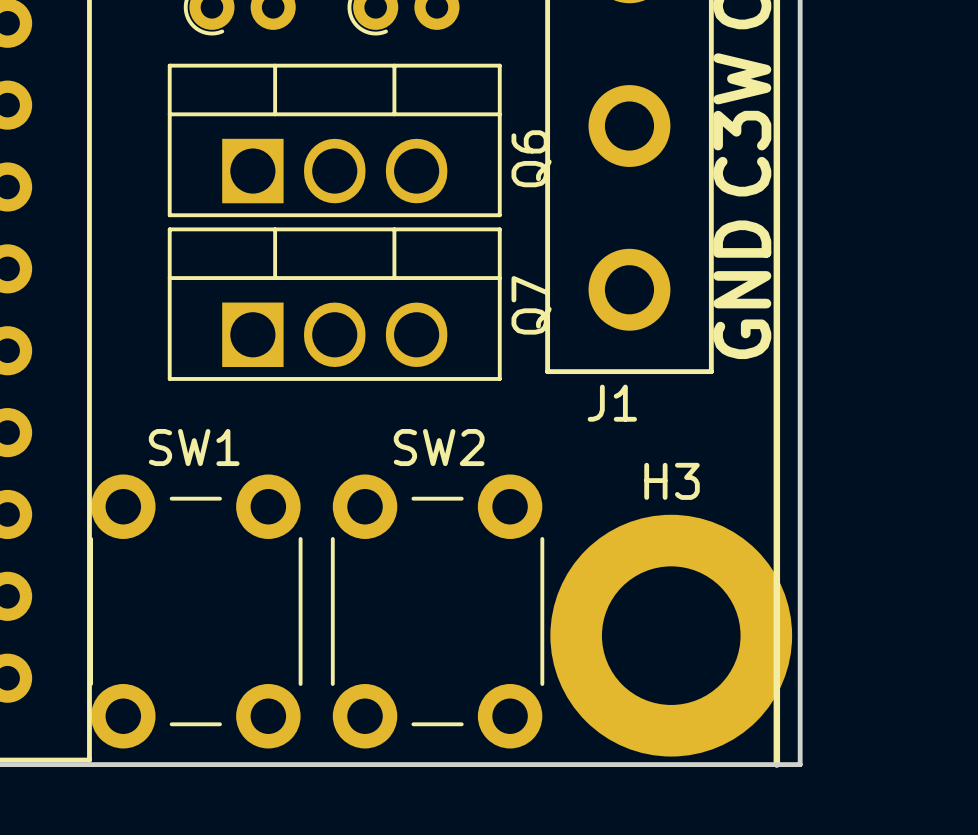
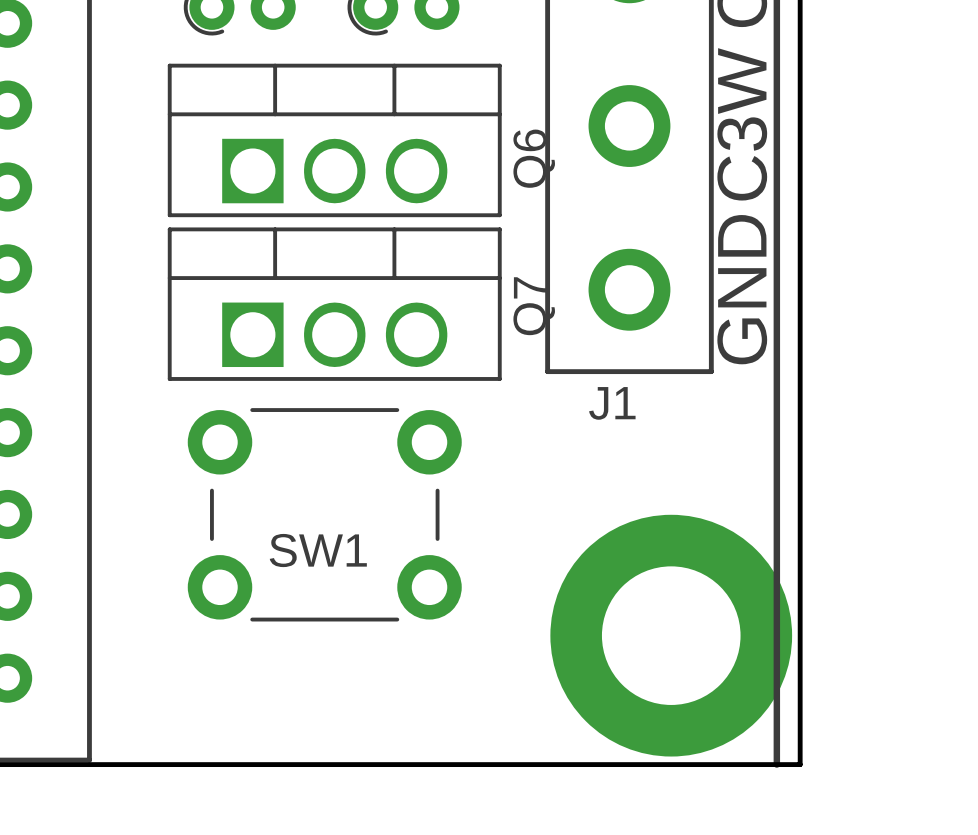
SW1 name position: SW1 (194, 447) -> SW1 (318, 550)
H3 name: H3 (672, 481) -> none
SW1 rotation: 0° (195, 611) -> 90° clockwise (324, 514)
SW2: (437, 611) -> none

